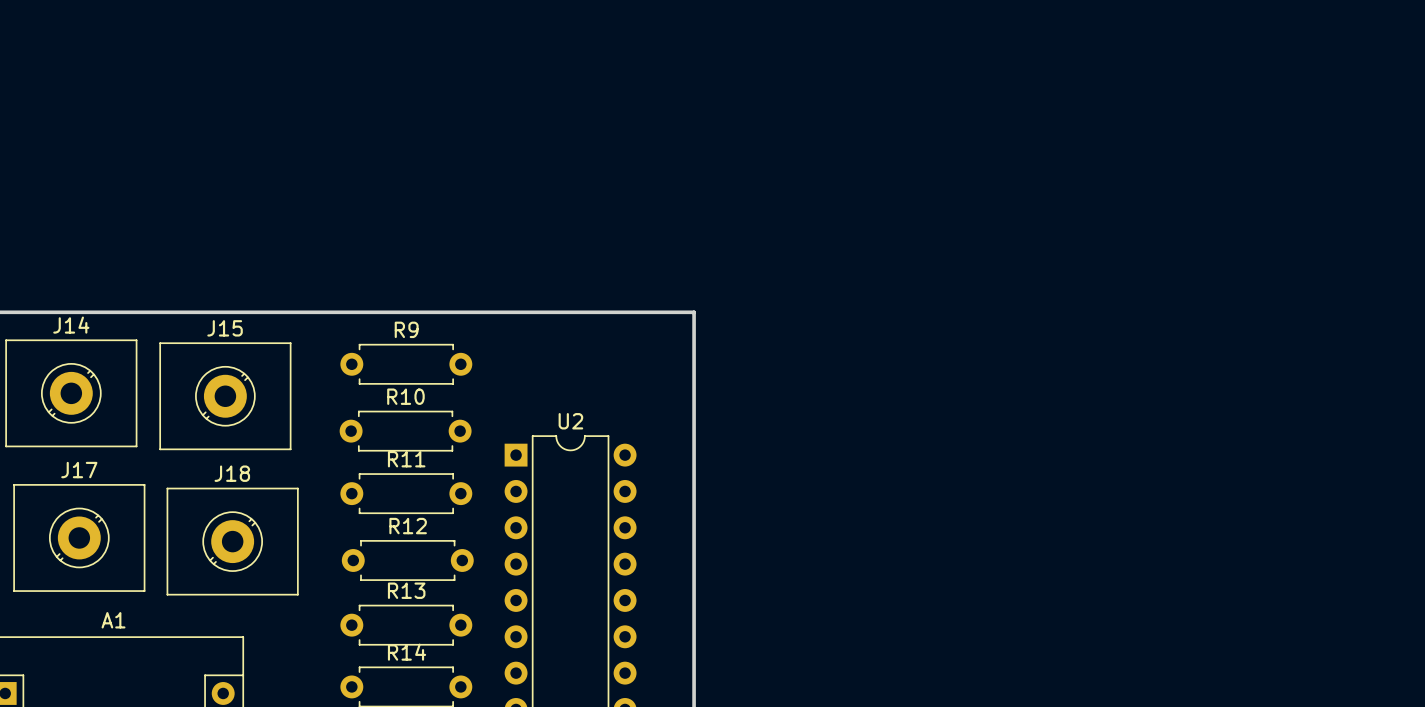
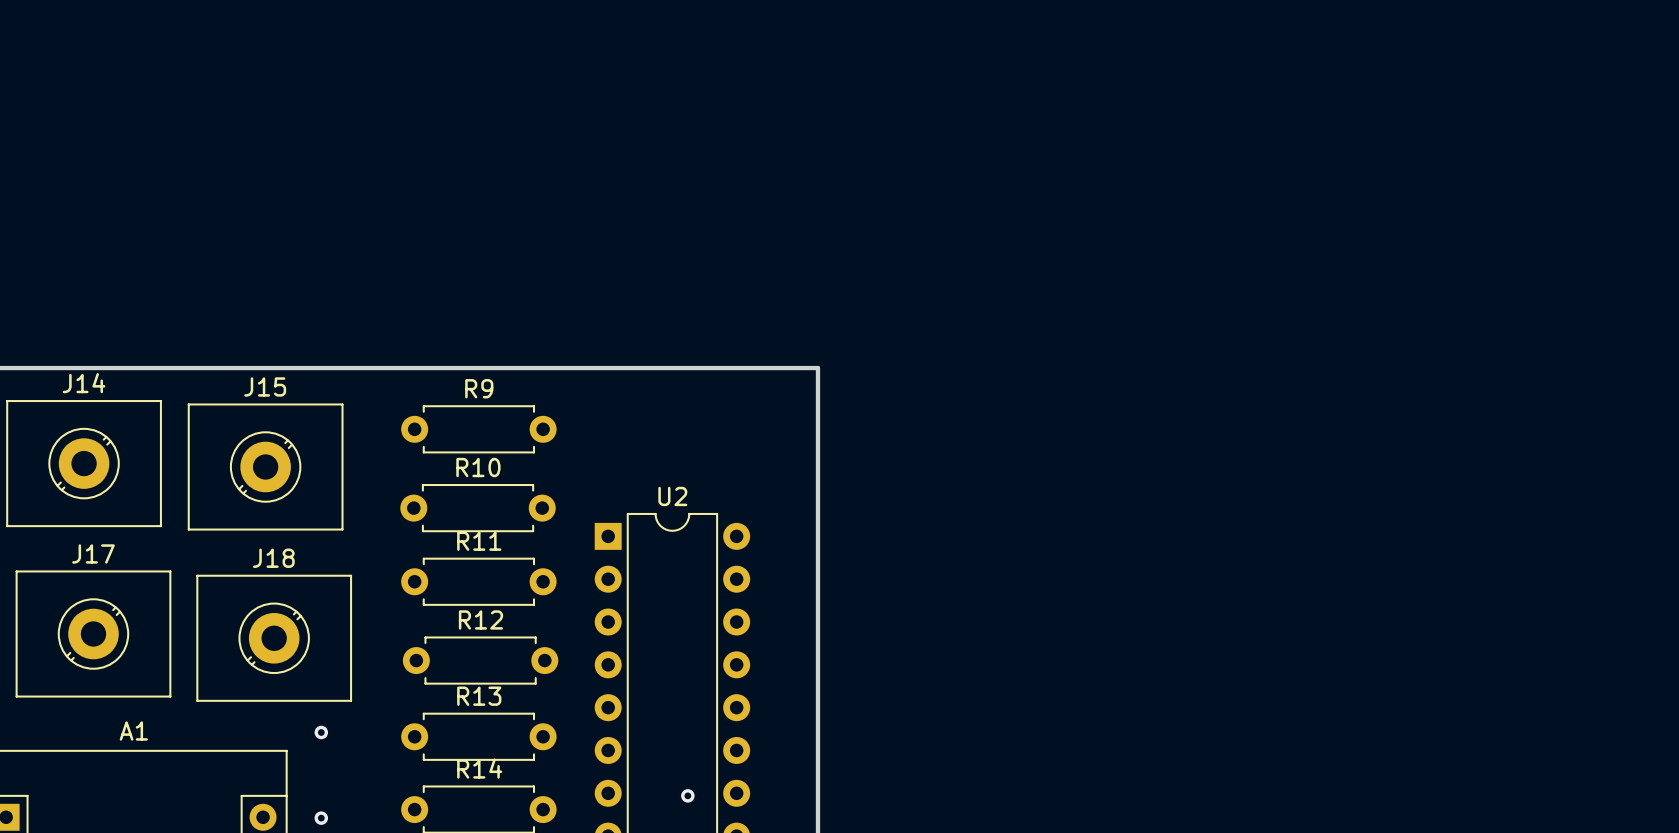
via: none -> (321, 732)
via: none -> (687, 795)
via: none -> (321, 818)

